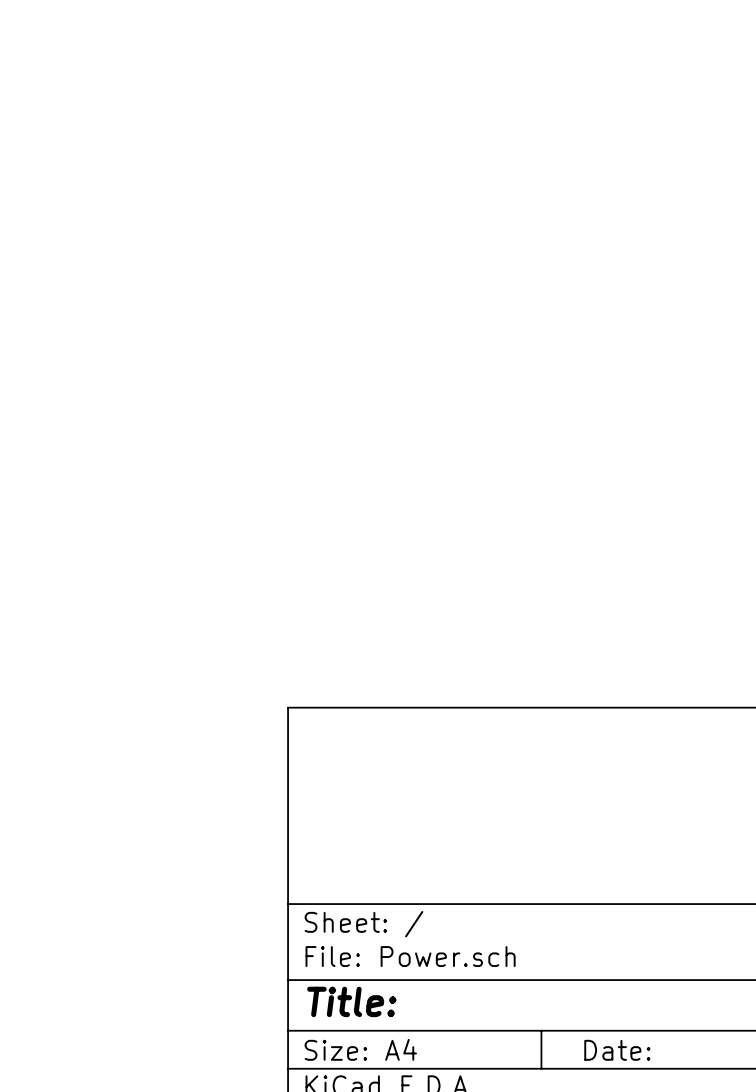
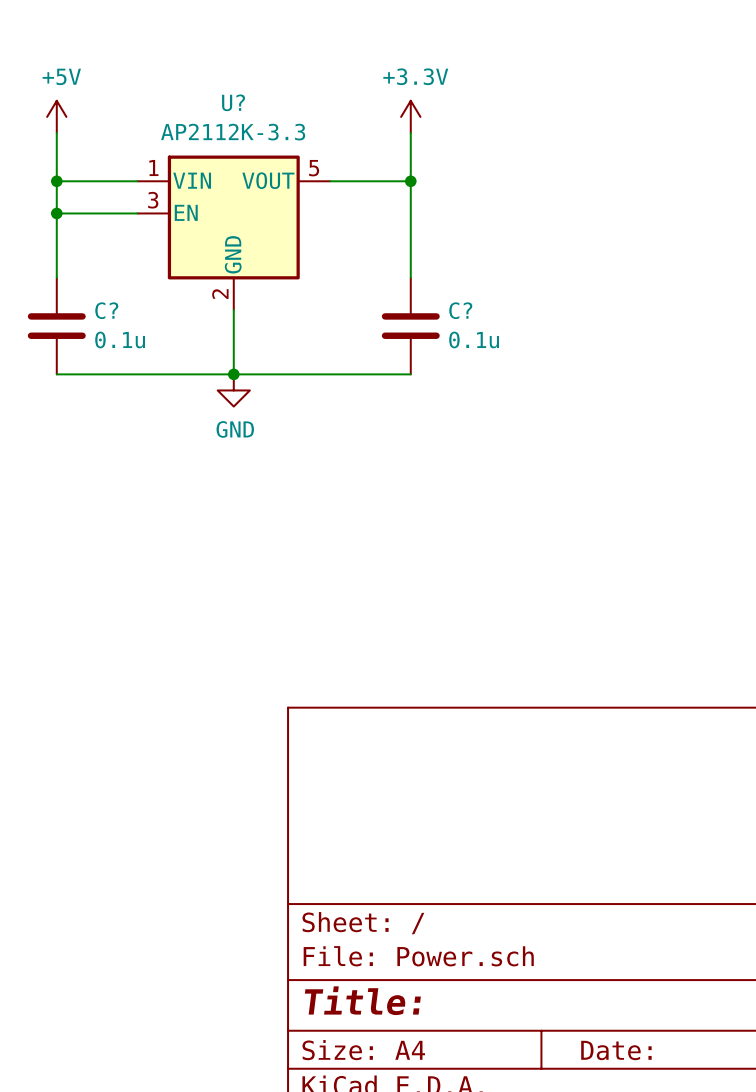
power symbol: none -> +5V (56, 116)
power symbol: none -> +3.3V (410, 116)
wire: none -> (56, 133) (56, 277)
wire: none -> (410, 133) (410, 277)
wire: none -> (56, 181) (137, 181)
junction: none -> (56, 181)
wire: none -> (330, 181) (410, 181)
junction: none -> (410, 181)
wire: none -> (56, 213) (137, 213)
junction: none -> (56, 213)
U?: none -> AP2112K-3.3 (233, 232)
wire: none -> (233, 310) (233, 374)
C?: none -> 0.1u (56, 326)
C?: none -> 0.1u (410, 326)
wire: none -> (56, 374) (410, 374)
junction: none -> (233, 374)
power symbol: none -> GND (233, 390)

